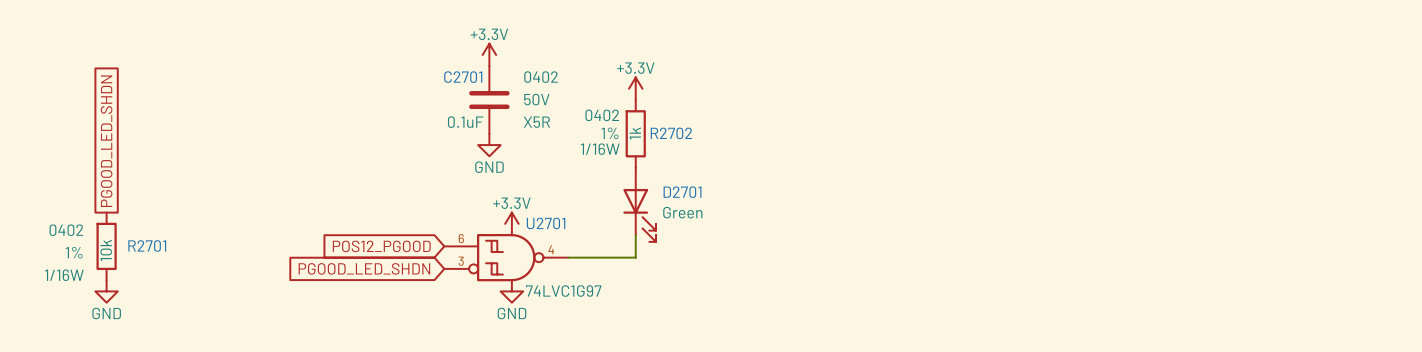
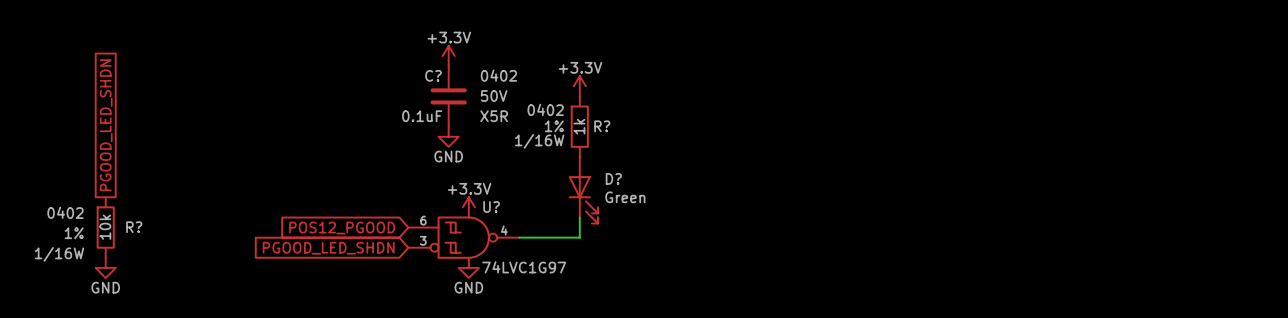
C2701 name: C2701 (463, 77) -> C? (433, 75)
R2702 name: R2702 (671, 133) -> R? (602, 126)
D2701 name: D2701 (682, 192) -> D? (613, 178)
U2701 name: U2701 (546, 223) -> U? (491, 206)
R2701 name: R2701 (147, 245) -> R? (134, 227)

